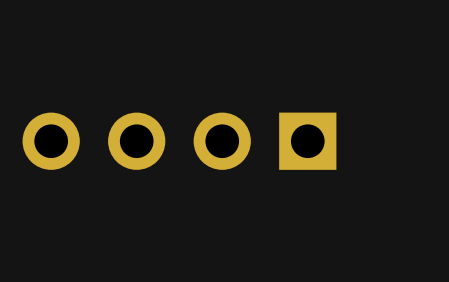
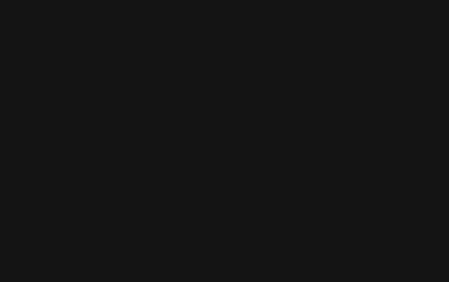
part: (179, 141) -> none

